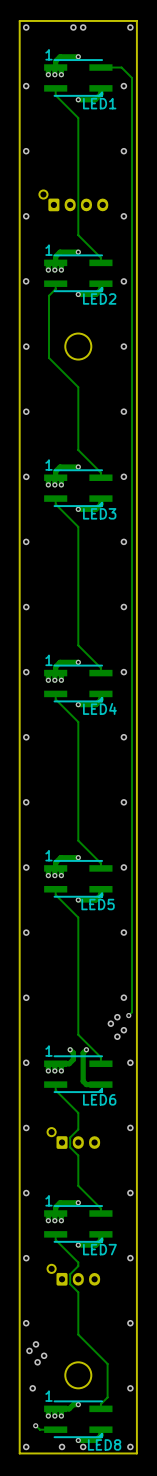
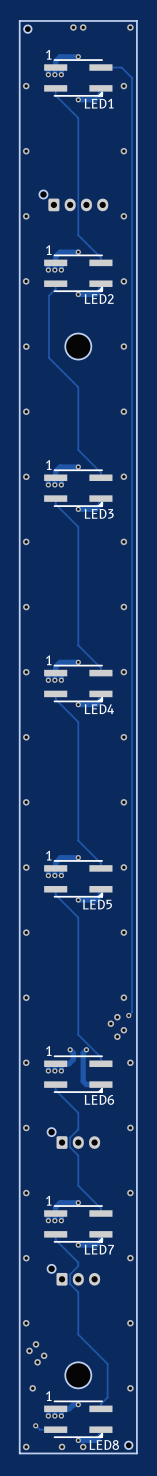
via: (26, 27) -> none
part: none -> (27, 29)
part: none -> (128, 1445)
via: (130, 1446) -> none

